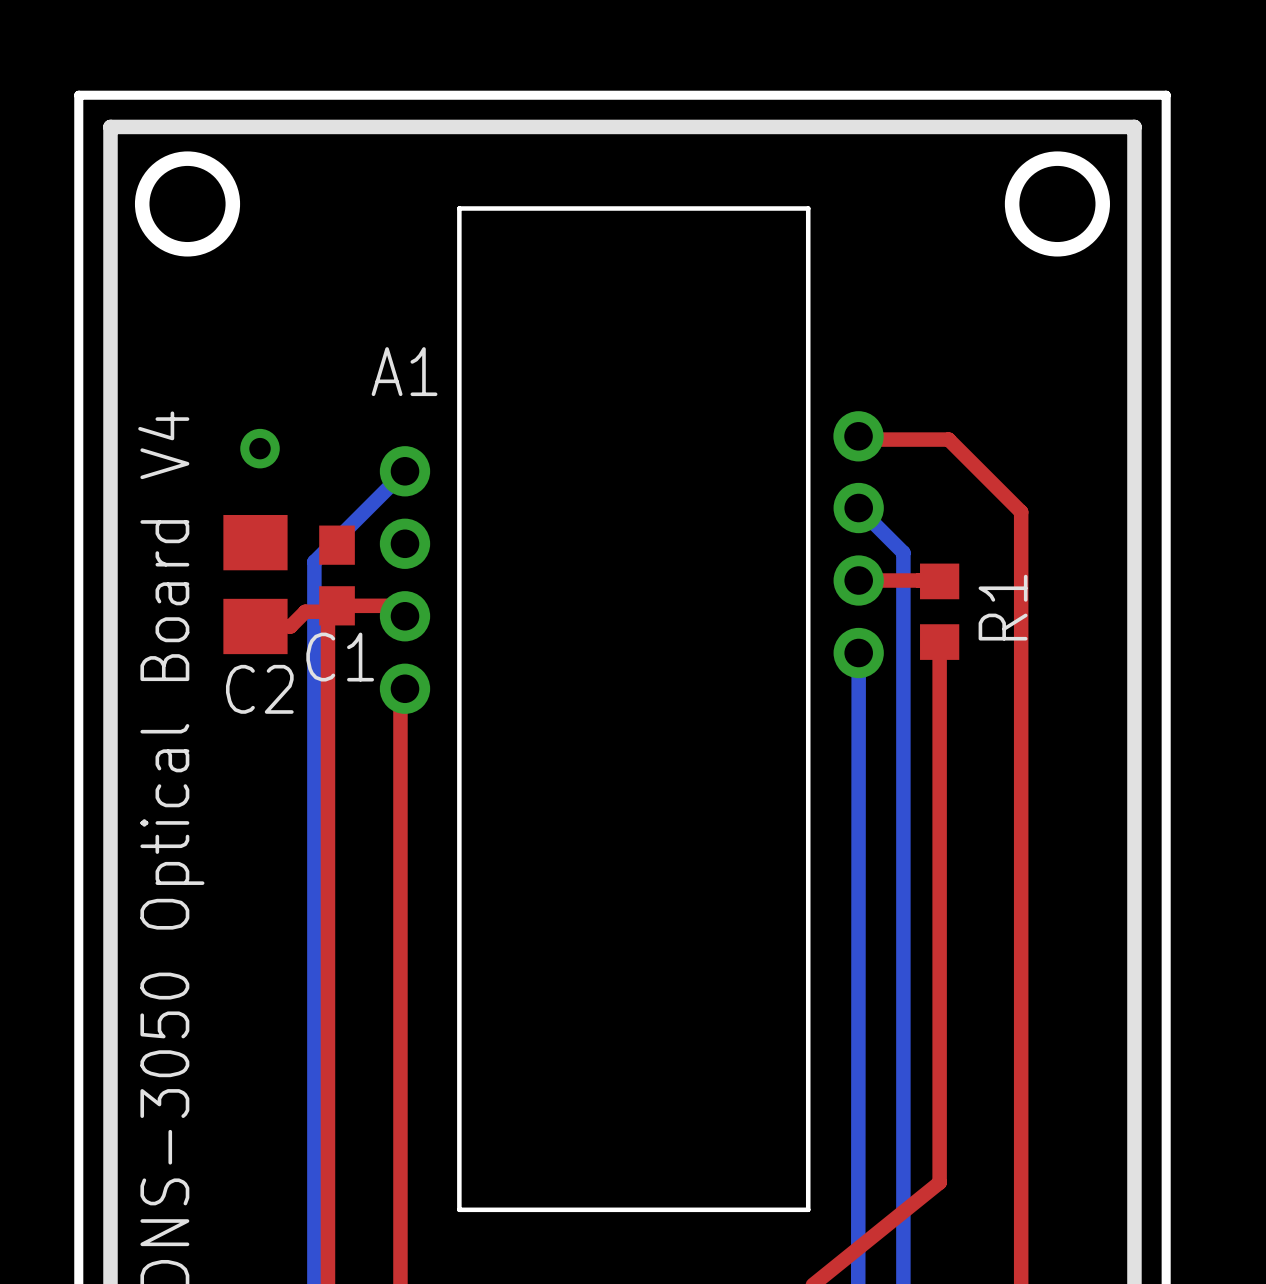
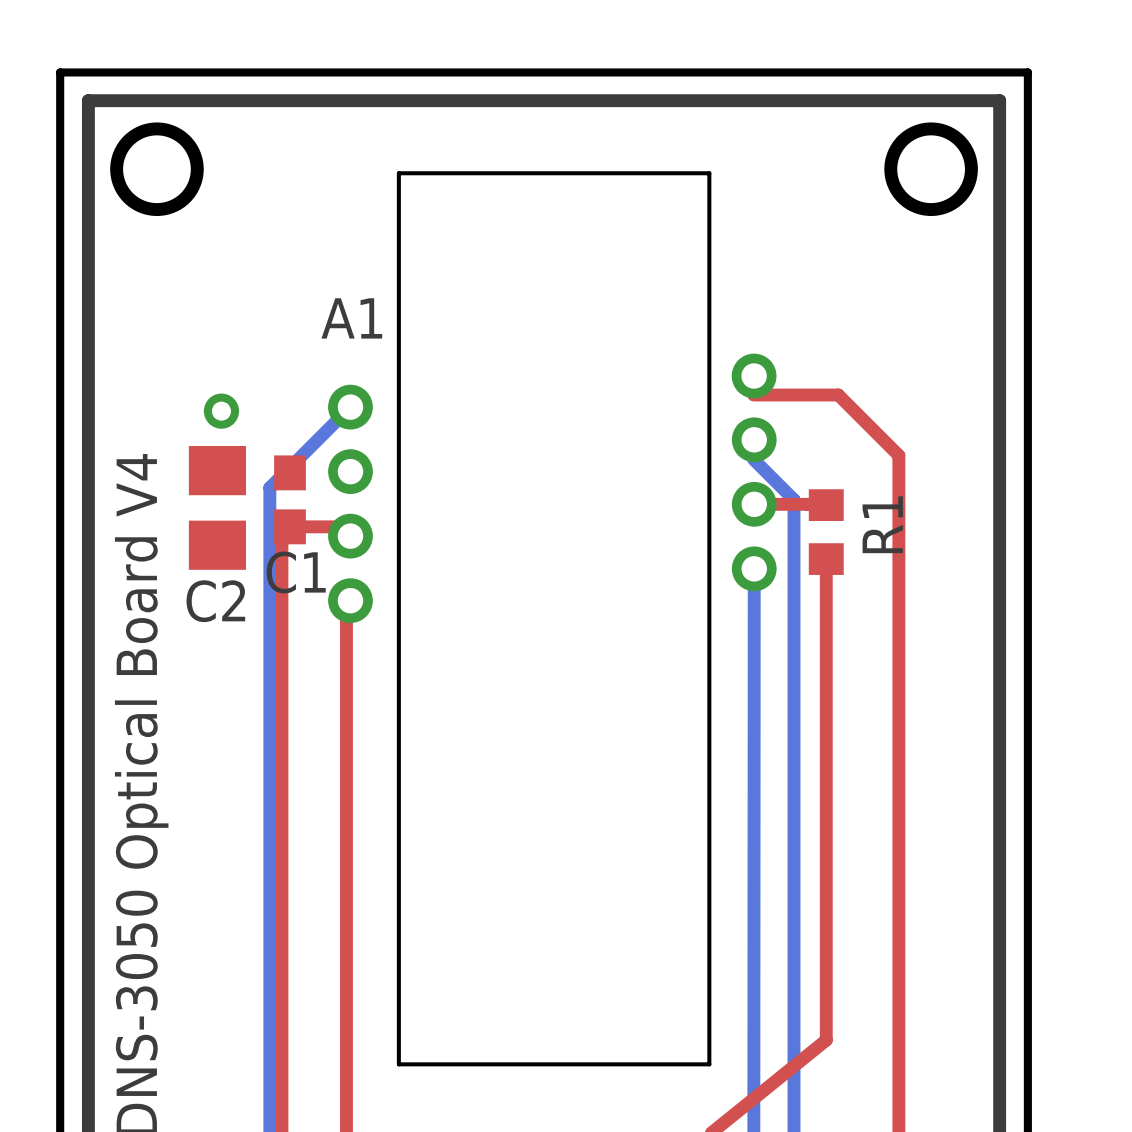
top track: (858, 436) (861, 439) (948, 439) (1021, 512) (1021, 525) -> (753, 395) (838, 395) (898, 455)
via position: (260, 448) -> (221, 411)
bottom track: (858, 508) (903, 552) (903, 575) -> (753, 459) (794, 499)
top track: (331, 611) (305, 611) (290, 626) (255, 626) -> none

